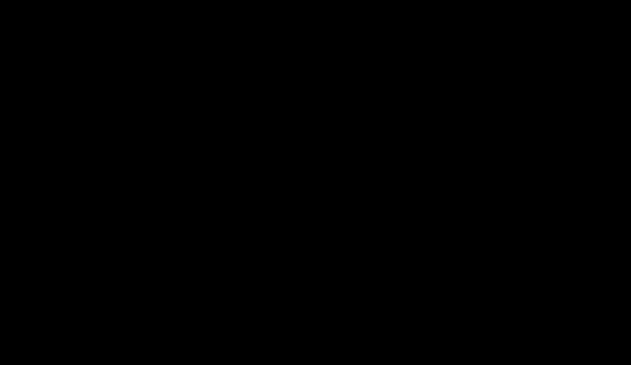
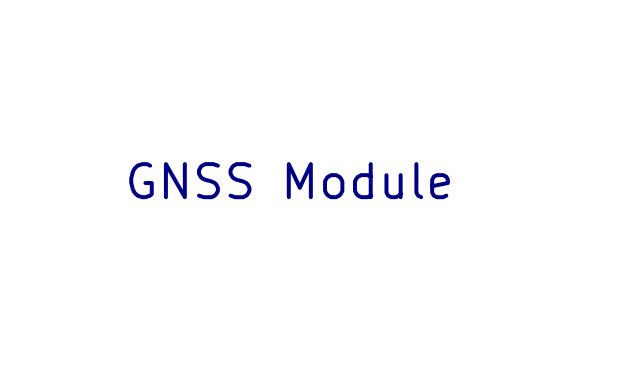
text: none -> GNSS Module (289, 180)

